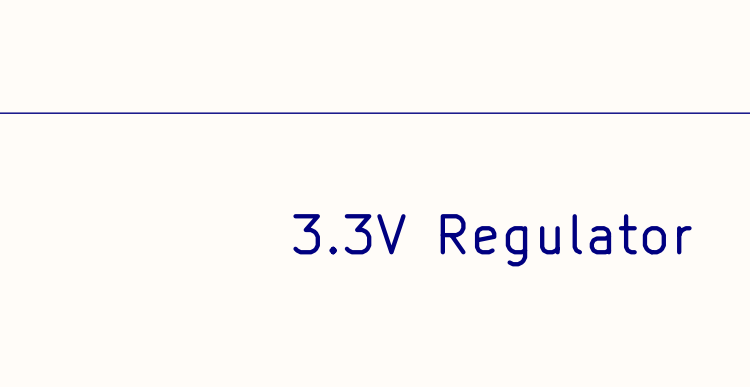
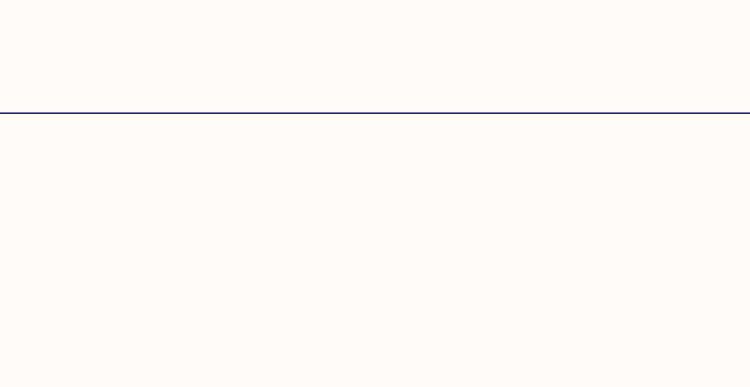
text: 3.3V Regulator (492, 240) -> none

